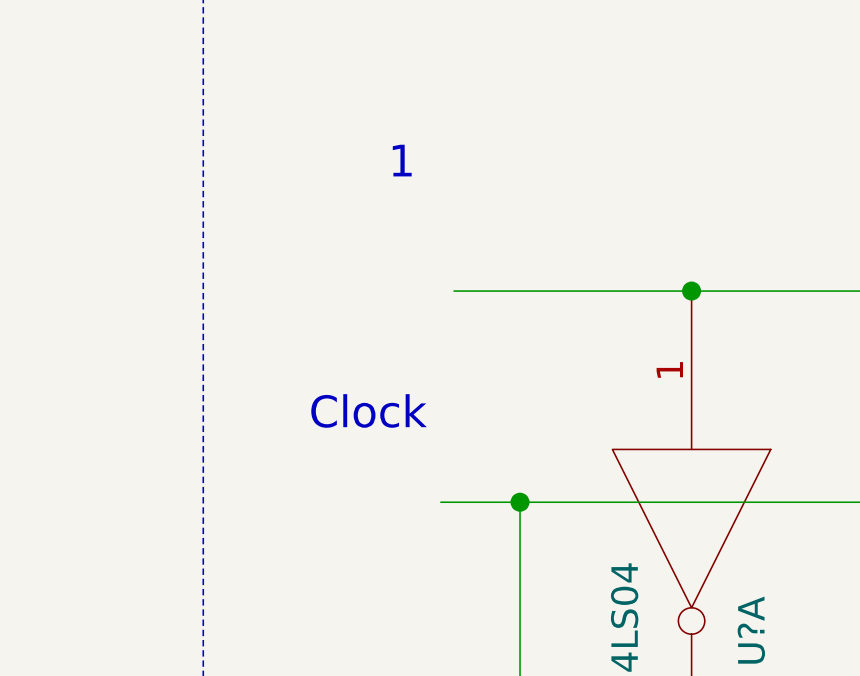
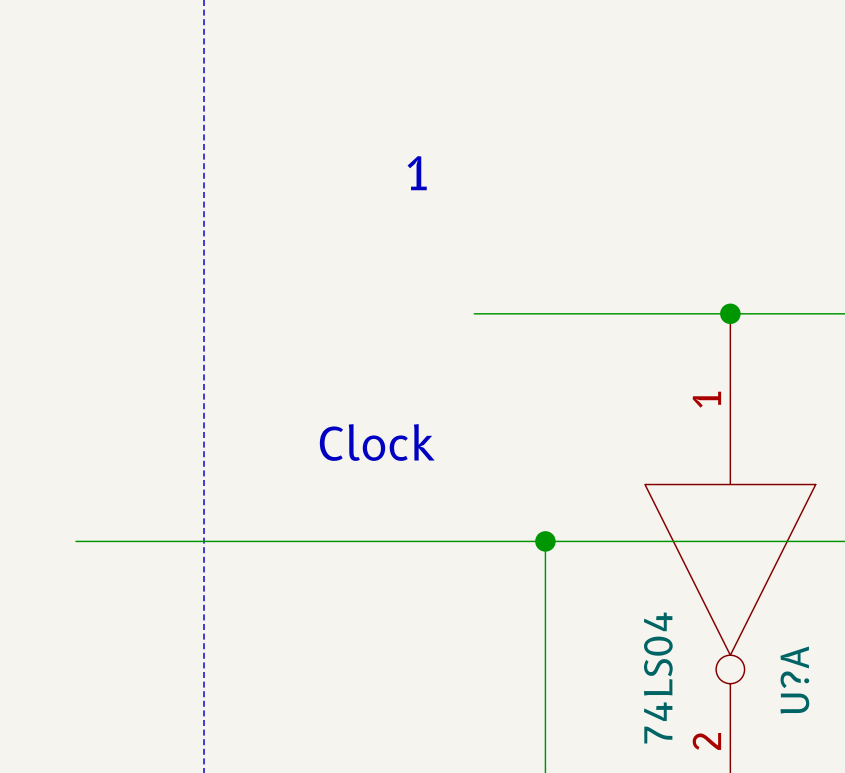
wire: none -> (75, 541) (460, 541)

